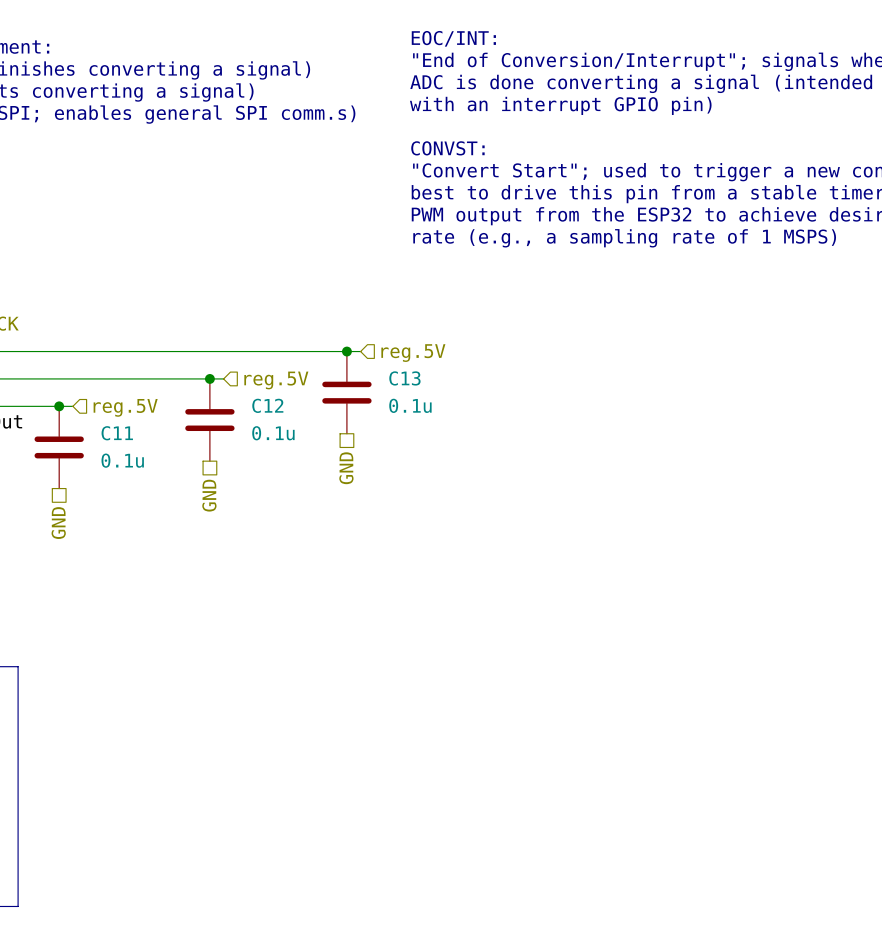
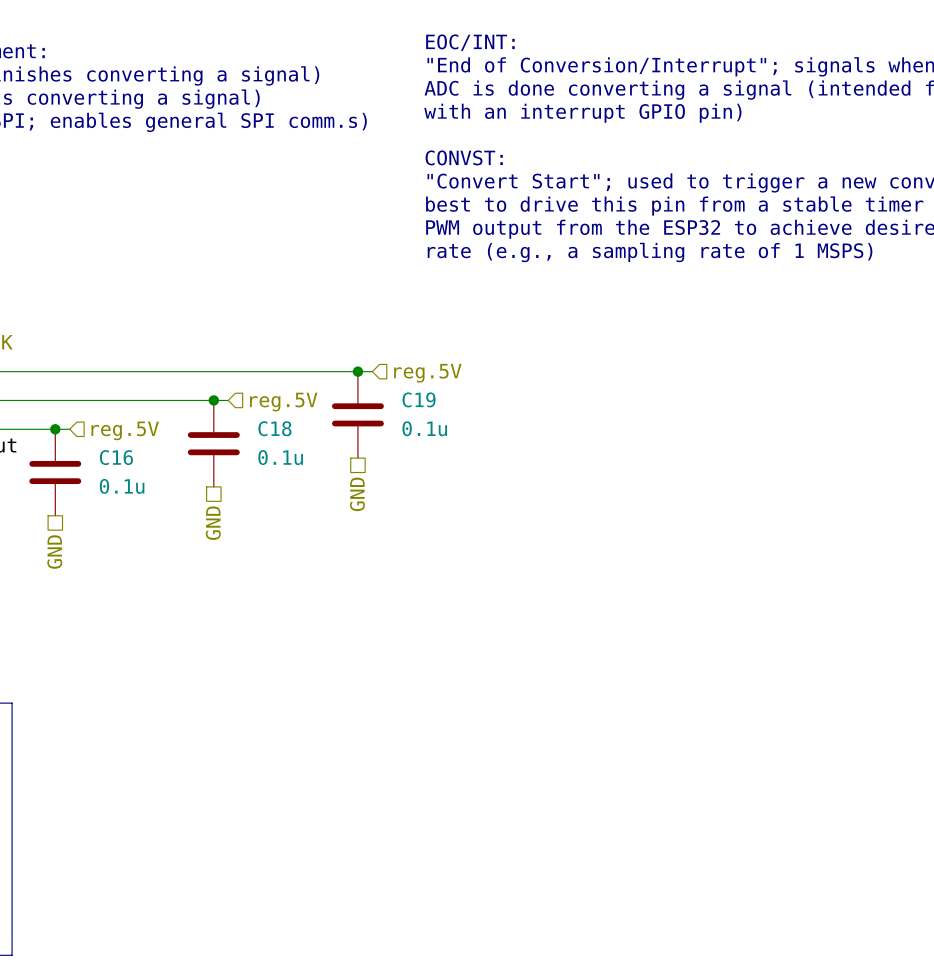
C13 name: C13 (404, 378) -> C19 (419, 399)
C12 name: C12 (267, 405) -> C18 (274, 428)
C11 name: C11 (117, 433) -> C16 (116, 457)

